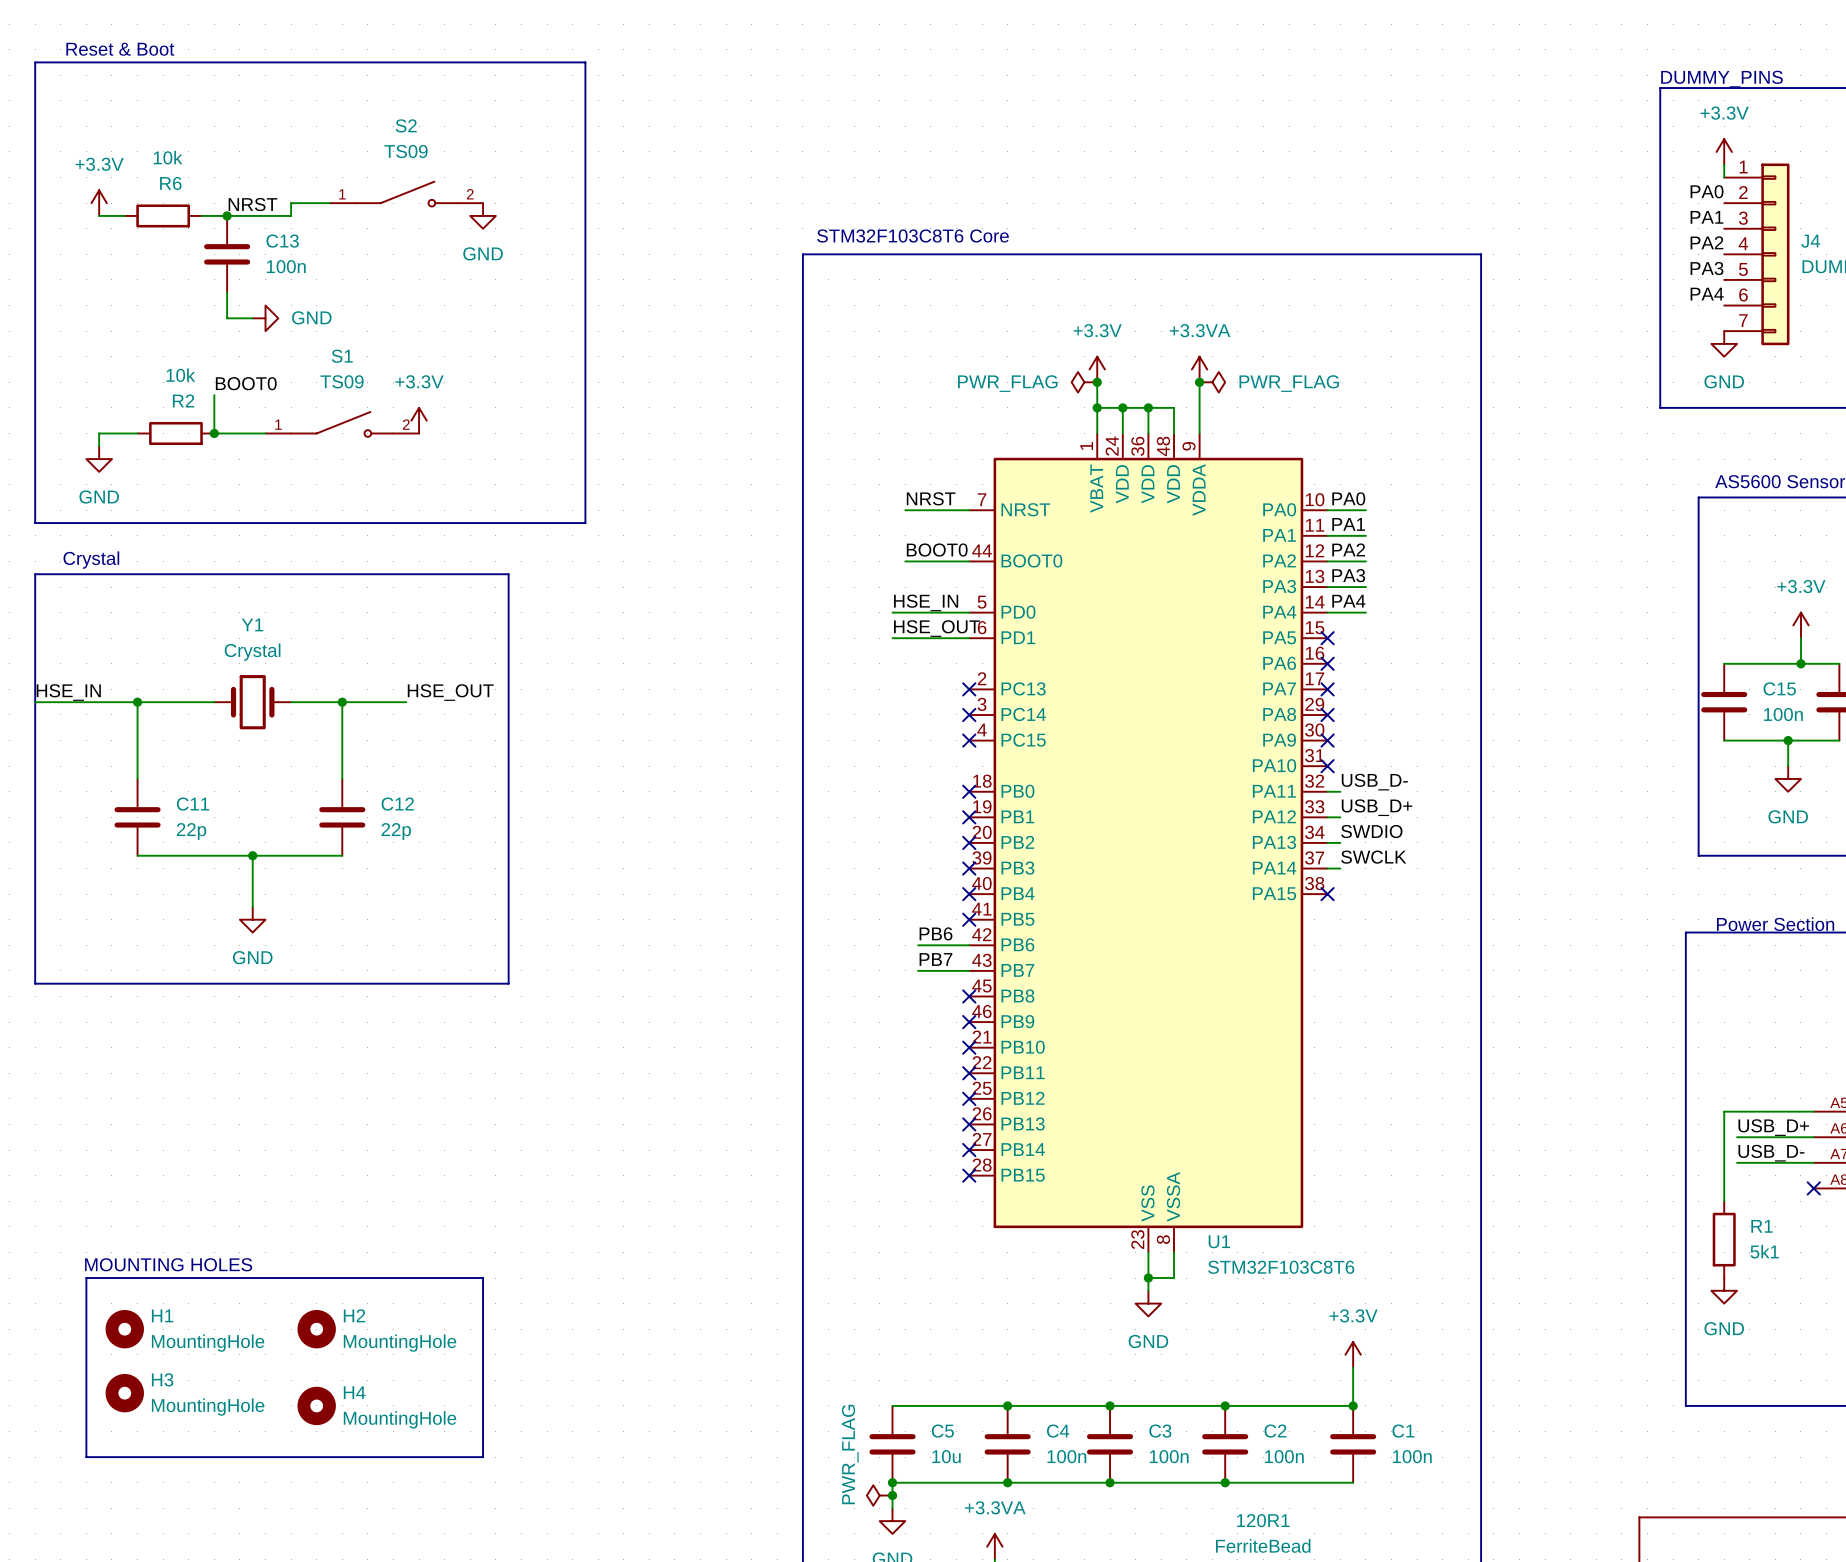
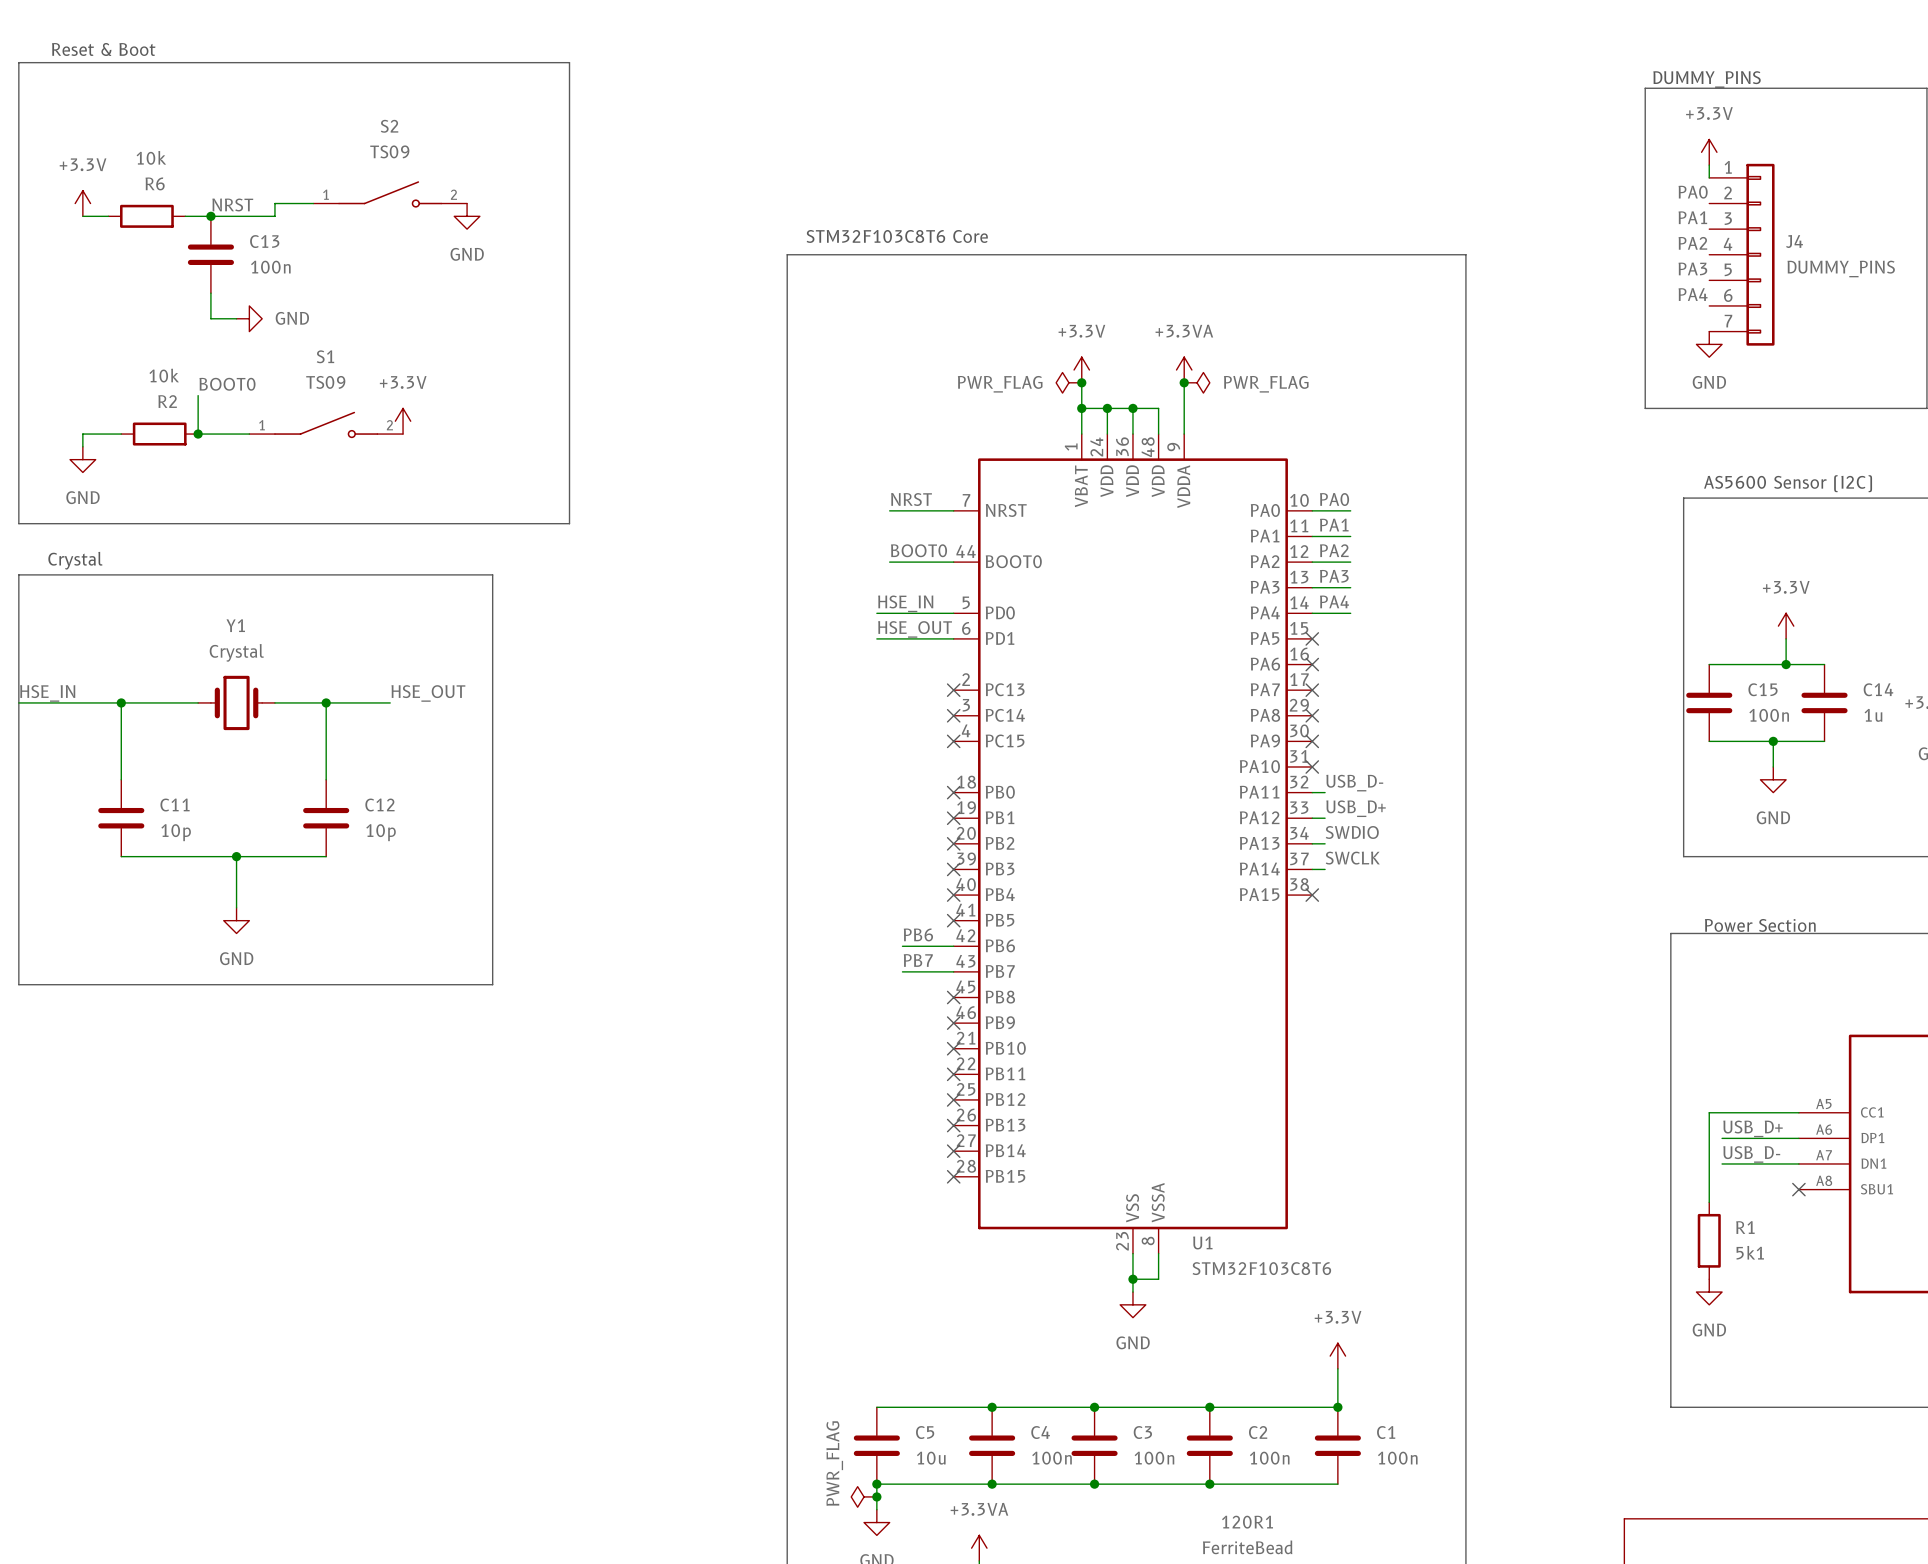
C11 value: 22p (191, 831) -> 10p (176, 832)
C12 value: 22p (396, 831) -> 10p (381, 832)
text: MOUNTING HOLES (168, 1264) -> none
line: (86, 1278) (483, 1278) (483, 1457) (86, 1457) (86, 1278) -> none
H1: MountingHole (124, 1329) -> none
H2: MountingHole (316, 1329) -> none
H3: MountingHole (124, 1393) -> none
H4: MountingHole (316, 1405) -> none

